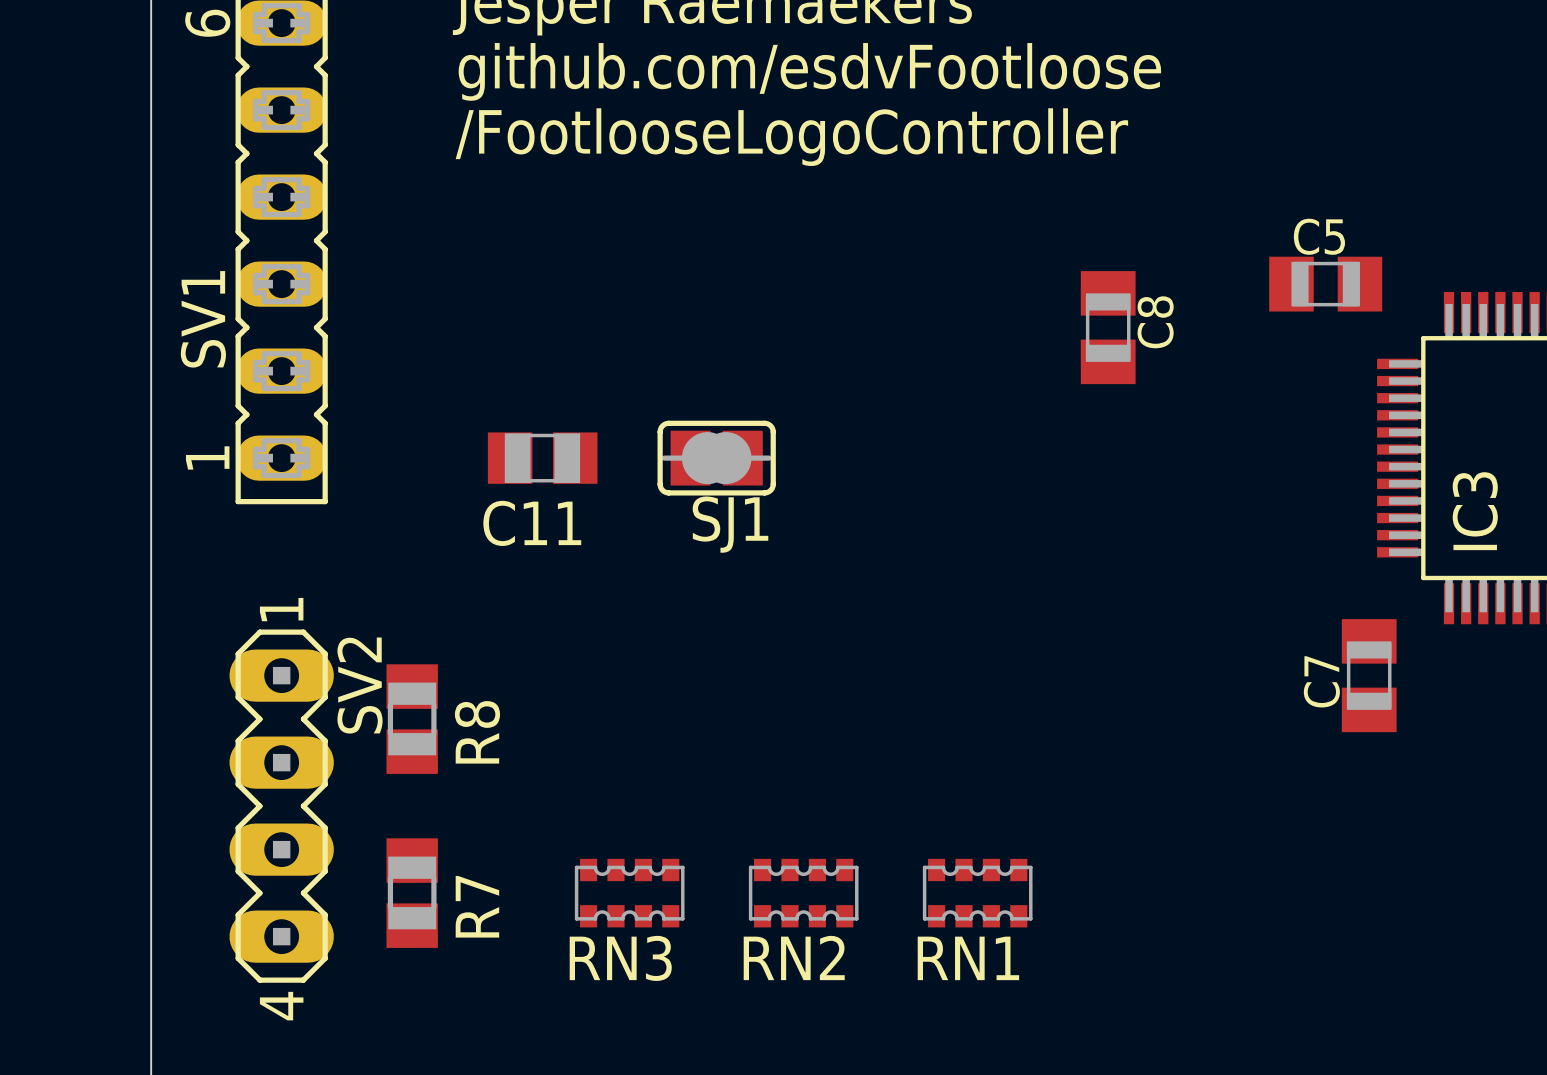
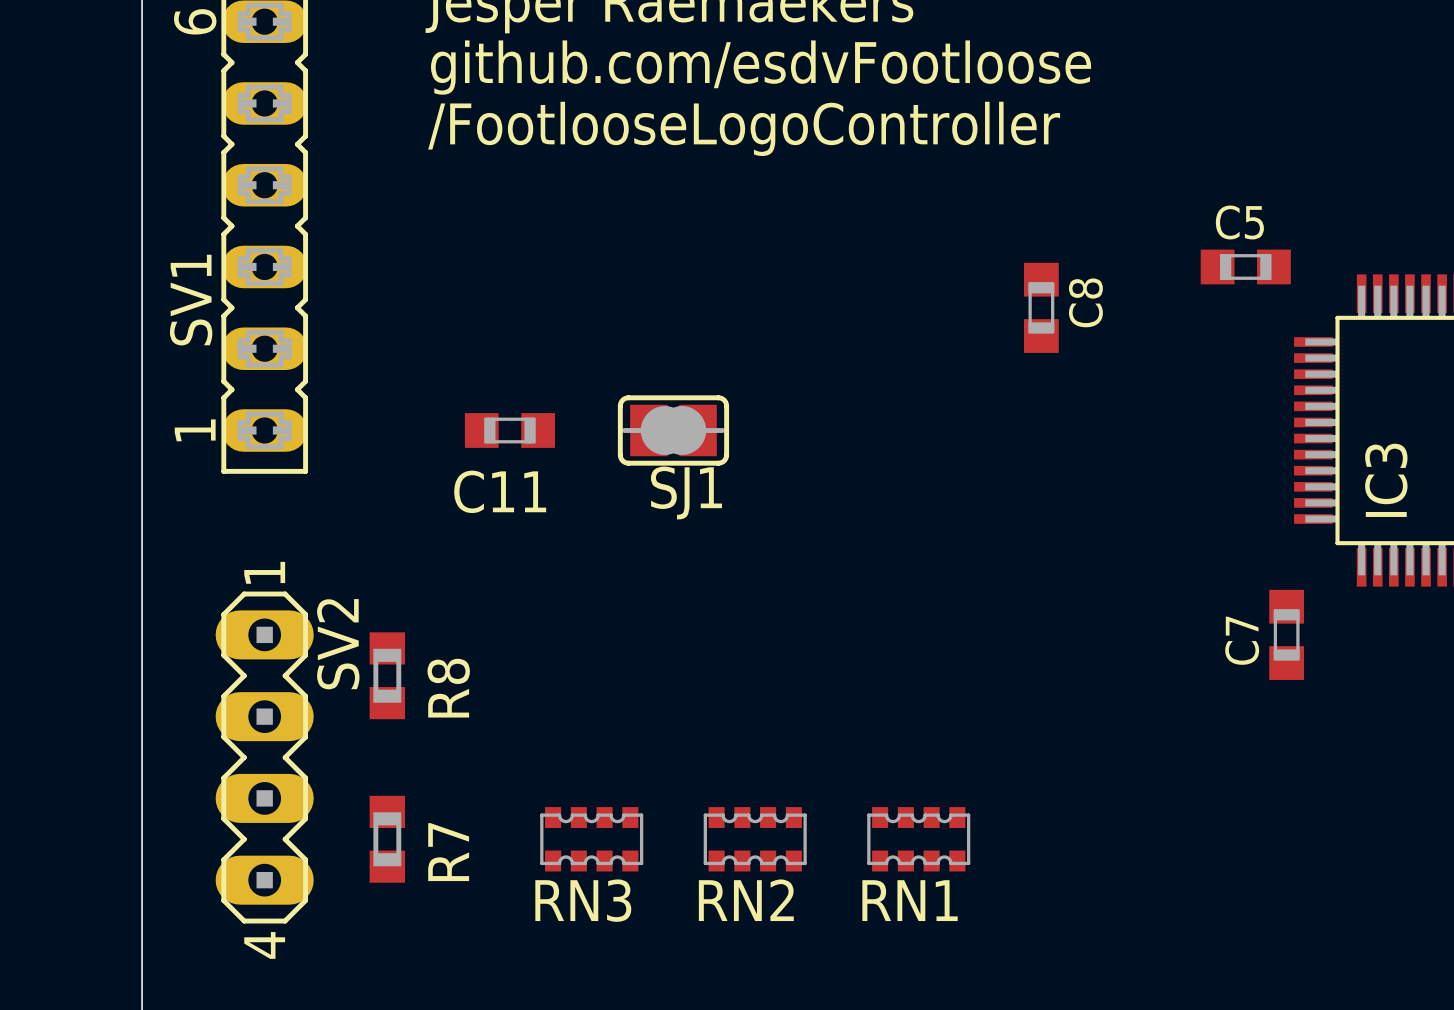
C5 footprint: [1269, 256, 1383, 312] -> [1200, 249, 1291, 285]
C8 footprint: [1080, 271, 1136, 385] -> [1024, 262, 1059, 353]
C11 footprint: [487, 432, 598, 484] -> [464, 413, 556, 448]
C7 footprint: [1341, 619, 1397, 733] -> [1269, 589, 1305, 680]
R8 footprint: [386, 664, 438, 774] -> [369, 632, 406, 720]
R7 footprint: [386, 838, 438, 948] -> [369, 795, 406, 883]

